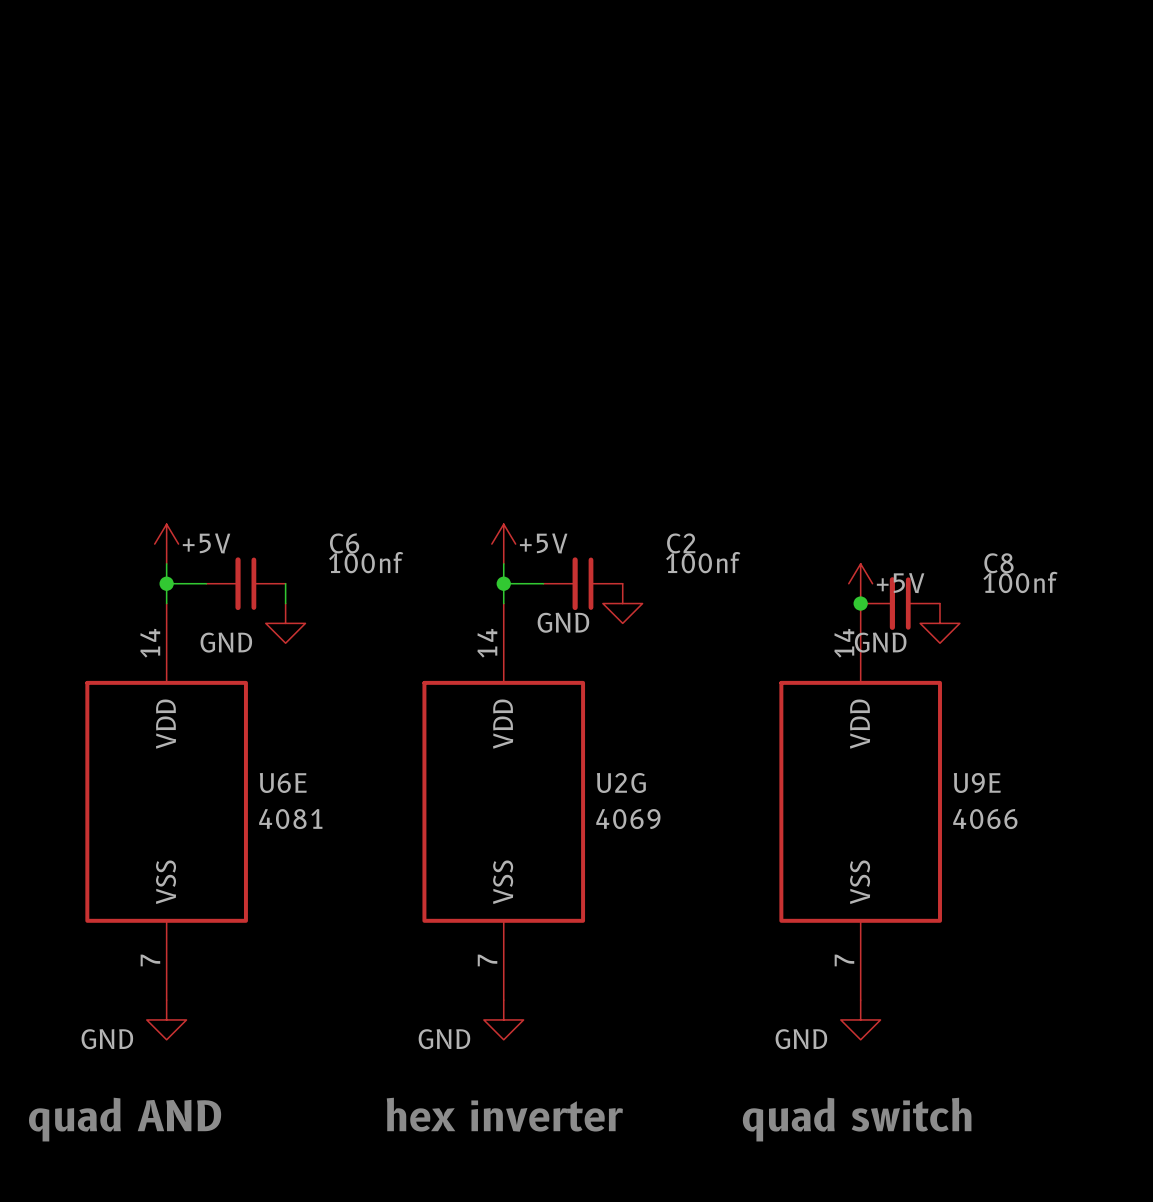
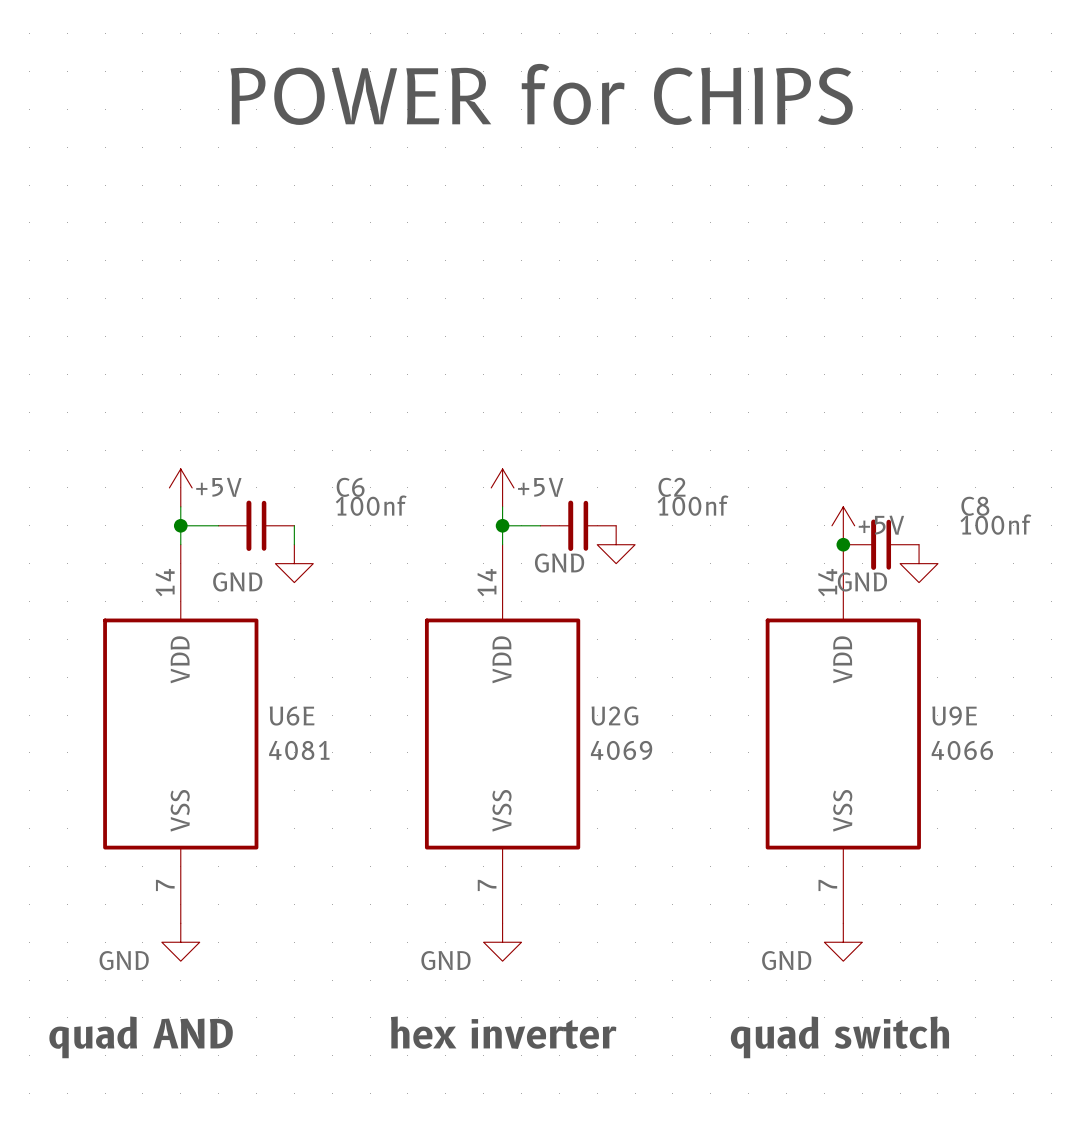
text: none -> POWER for CHIPS (541, 94)

